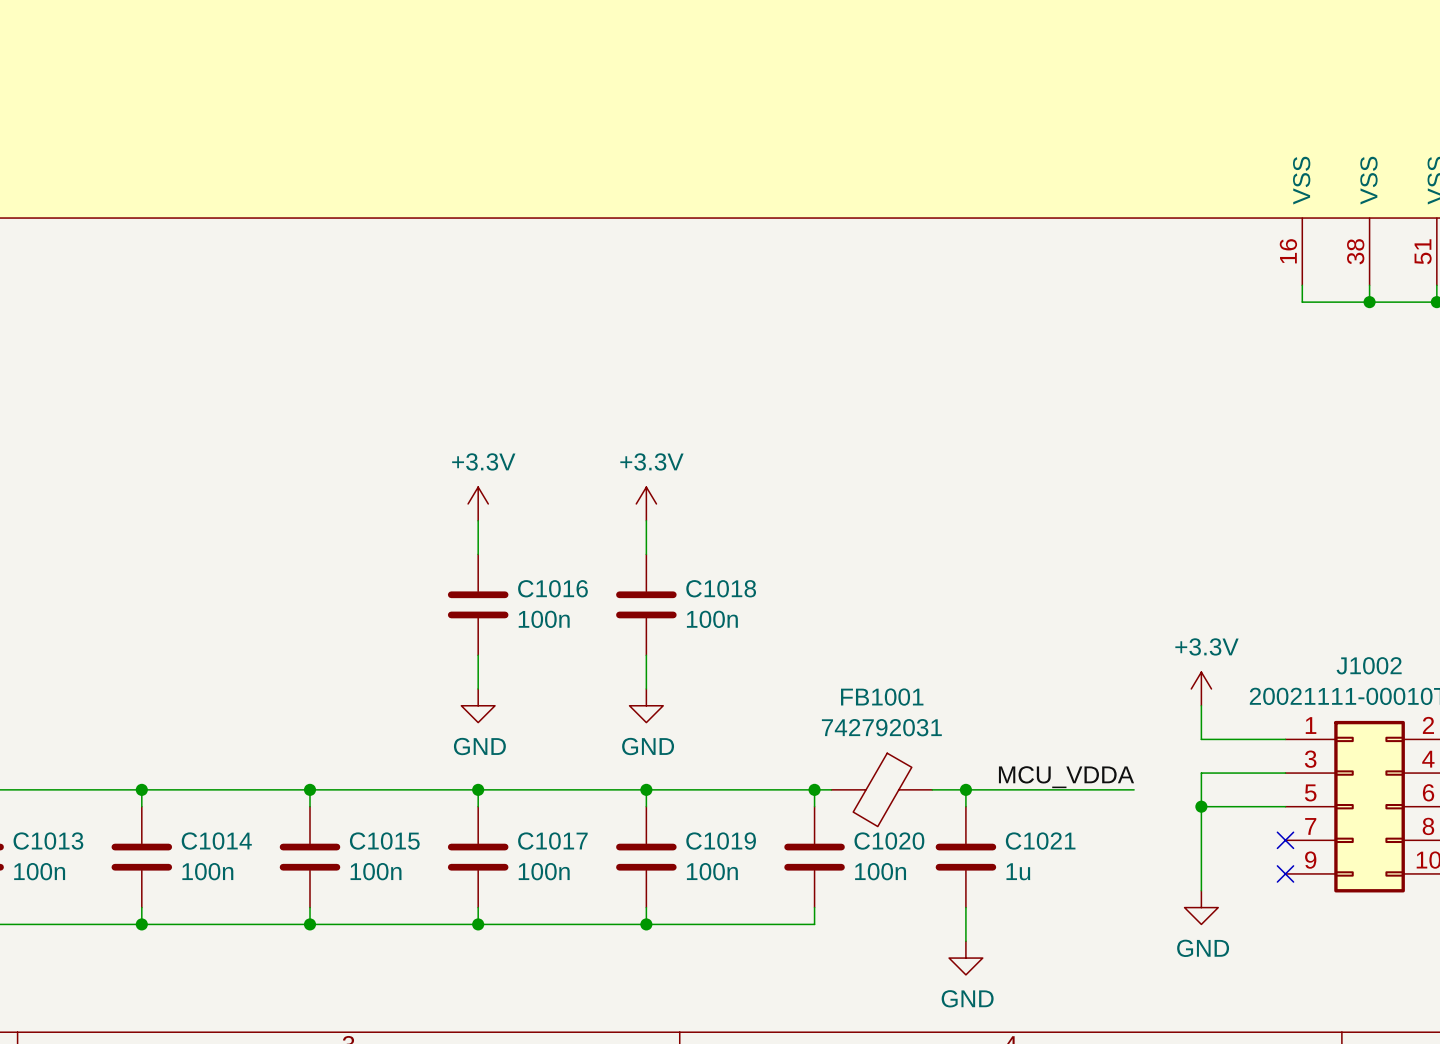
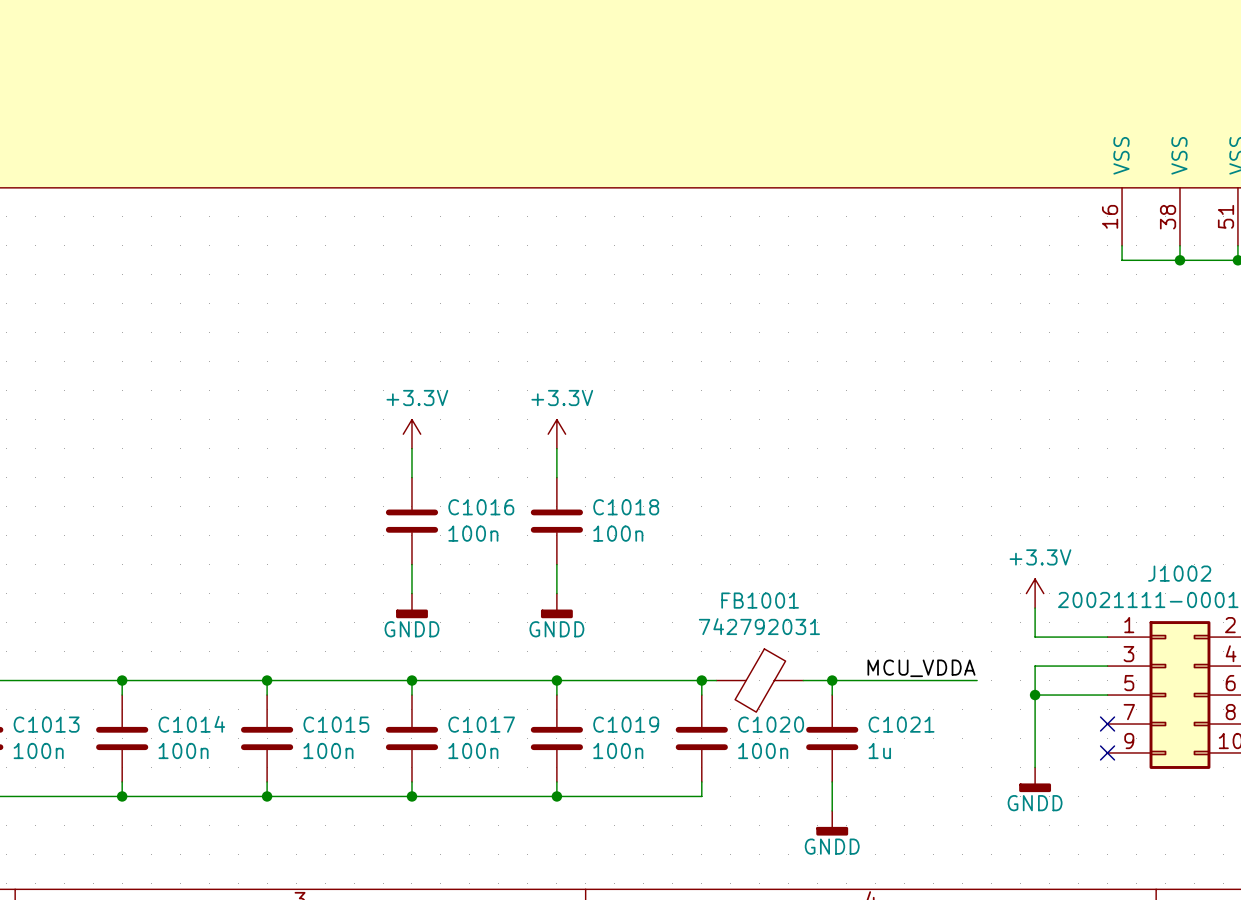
power symbol: GND (478, 705) -> GNDD (411, 605)
power symbol: GND (646, 705) -> GNDD (556, 605)
power symbol: GND (1201, 907) -> GNDD (1035, 779)
power symbol: GND (965, 958) -> GNDD (832, 823)

